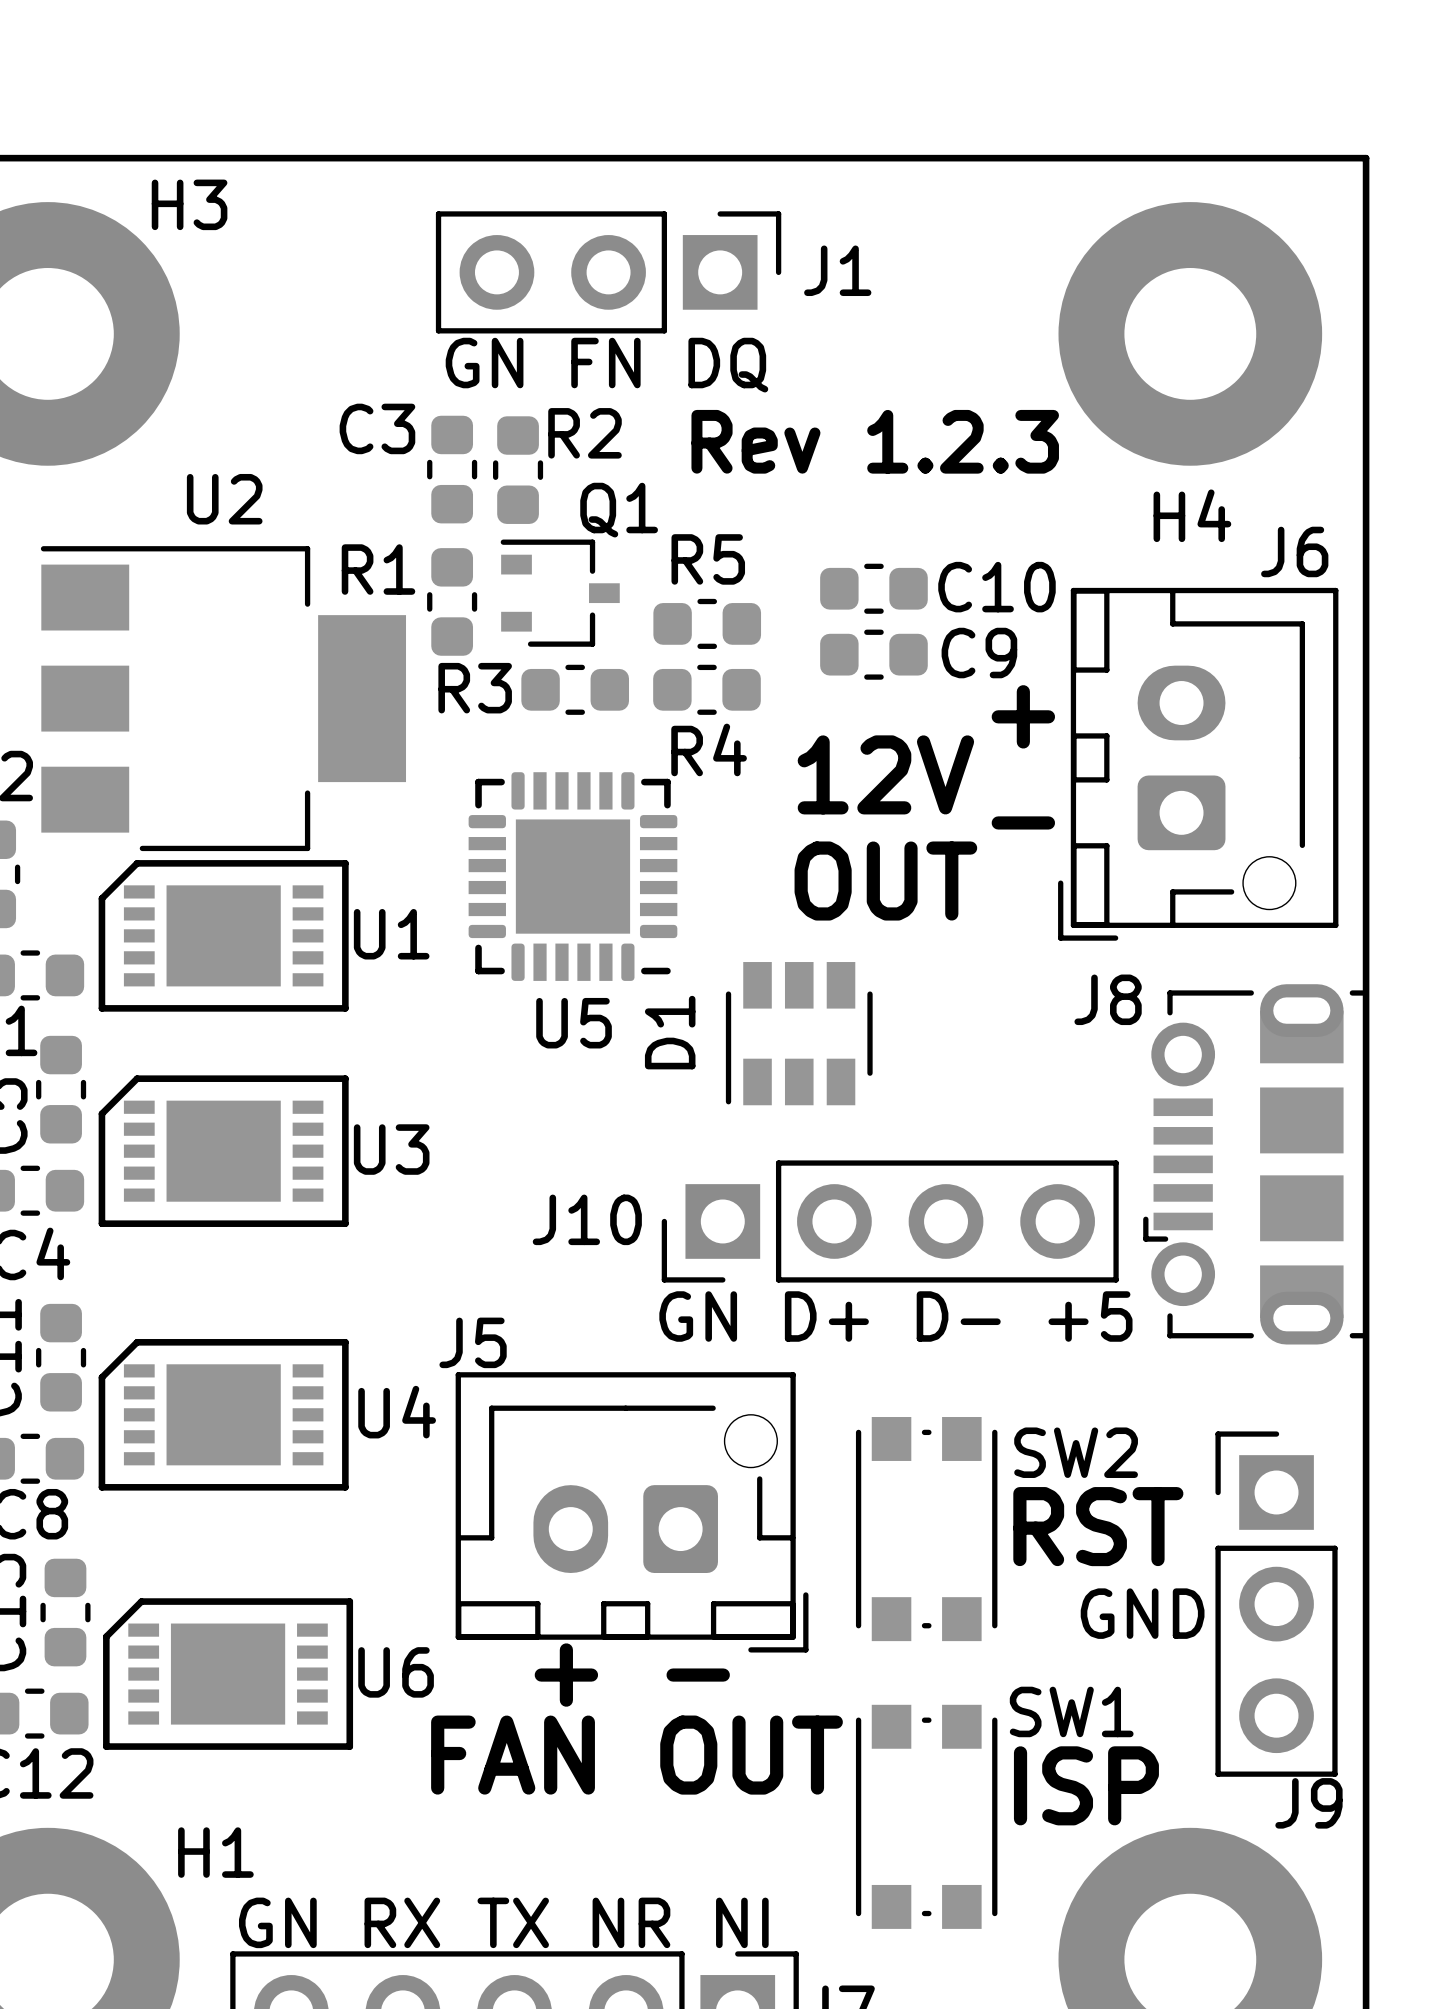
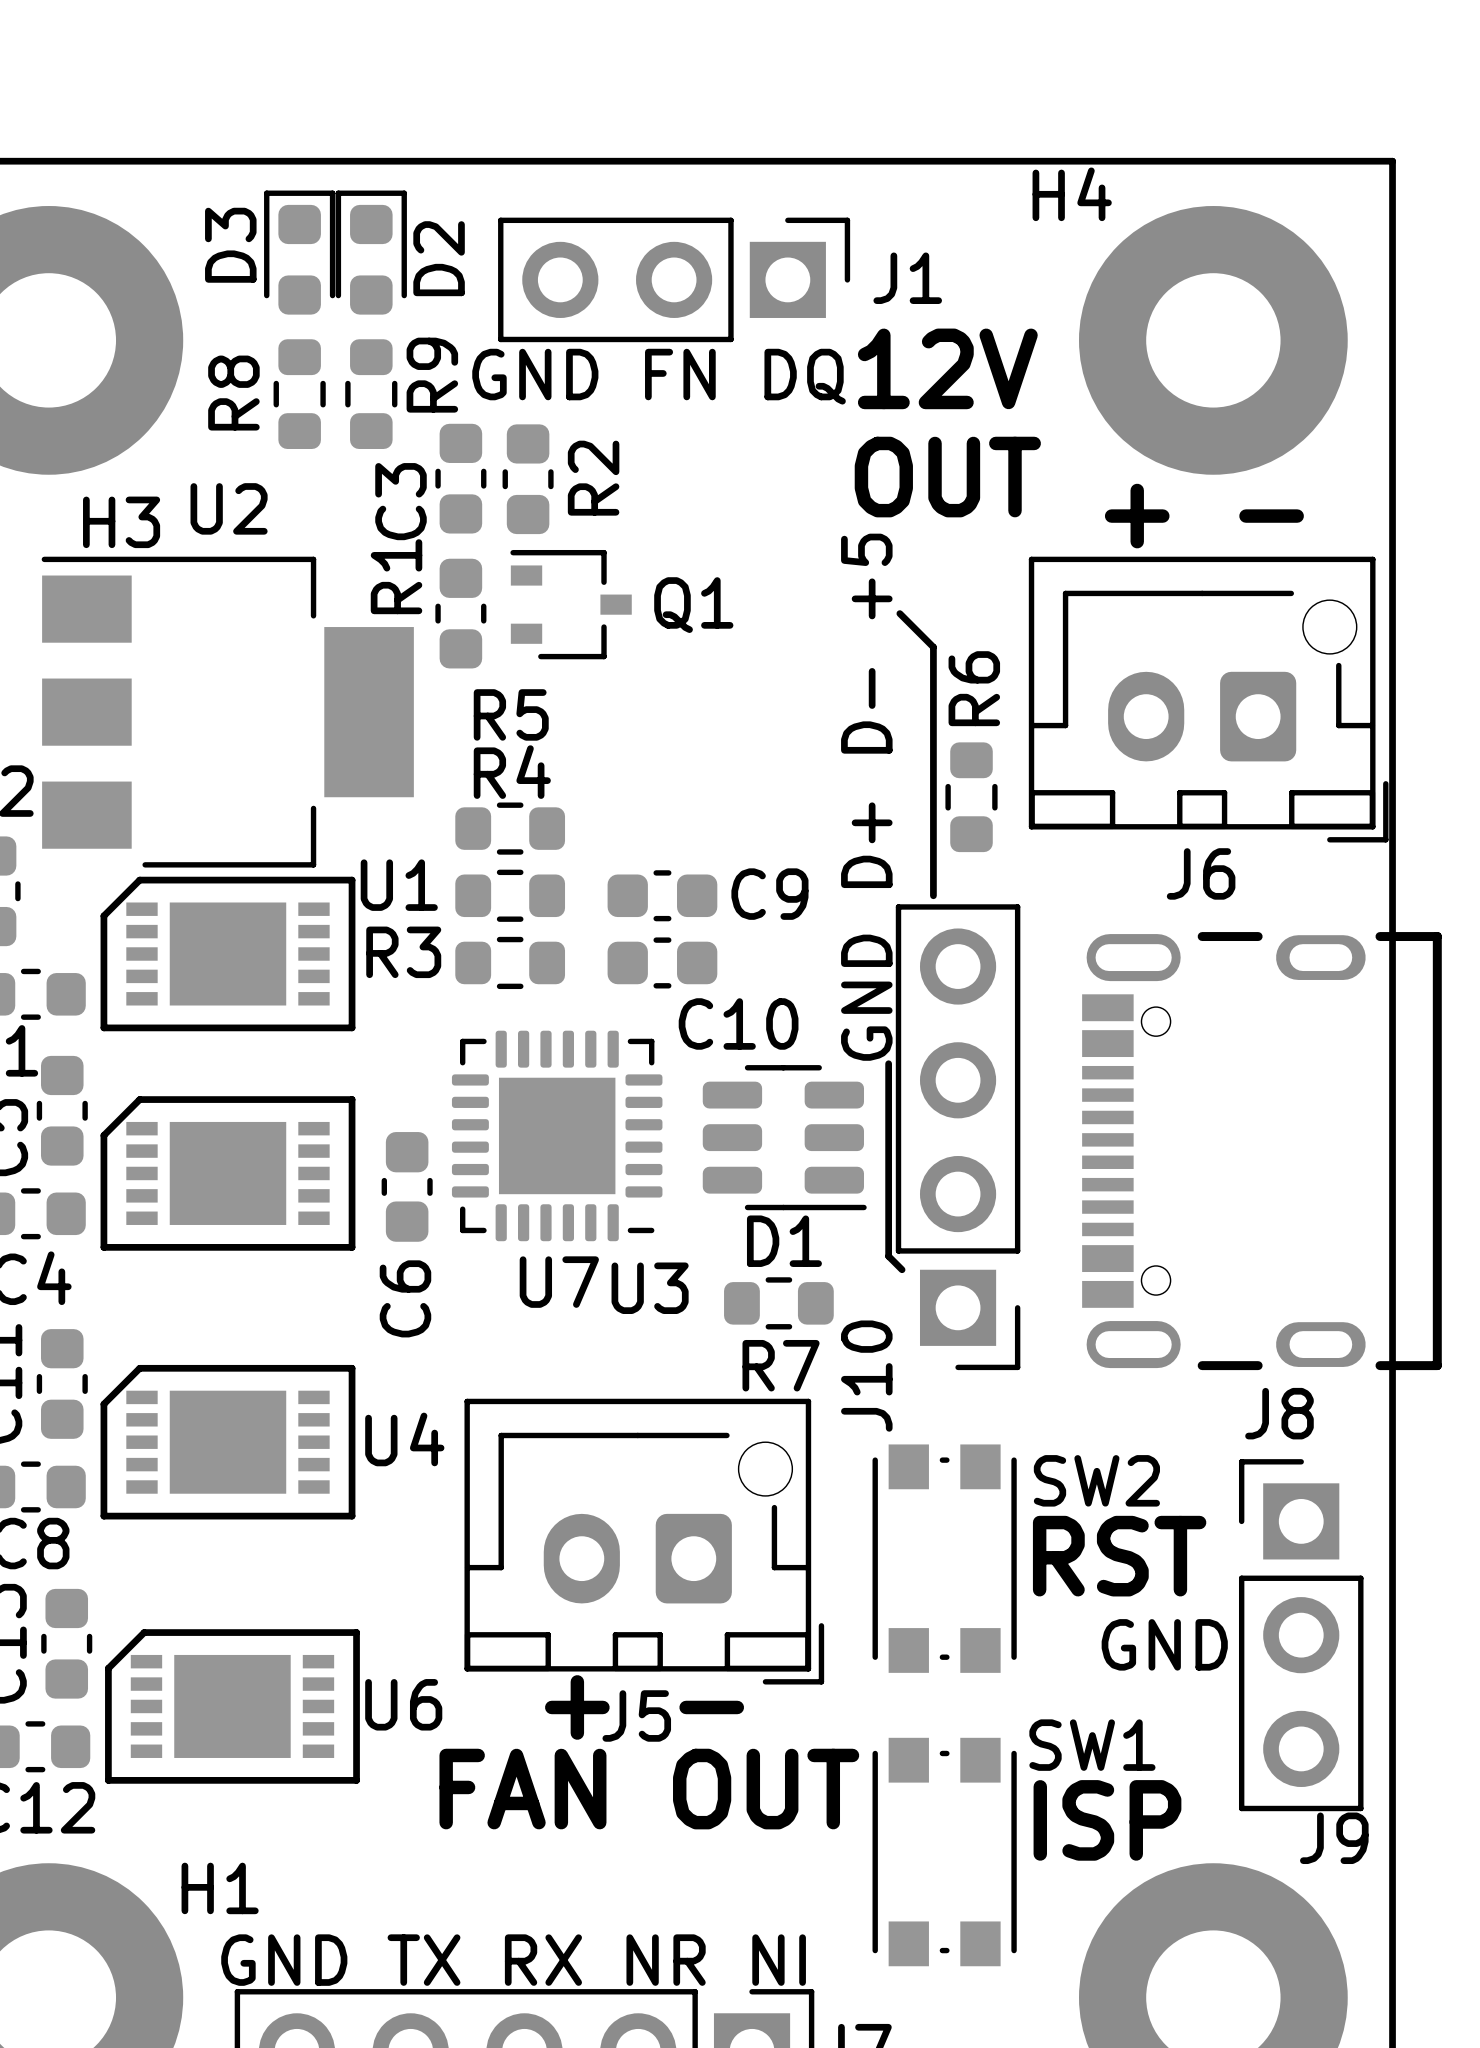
H3 name position: H3 (189, 204) -> H3 (121, 522)
D3: none -> (299, 252)
D2: none -> (371, 252)
J1 position: (608, 272) -> (674, 279)
text: GN FN DQ (606, 365) -> GND FN DQ (659, 376)
R8: none -> (299, 394)
R9: none -> (371, 394)
C3 name rotation: 0° (377, 428) -> 90° counterclockwise (400, 501)
R2 name rotation: 0° (585, 433) -> 90° counterclockwise (593, 478)
text: Rev 1.2.3 (875, 441) -> none
text: none -> + - (1204, 516)
Q1 name position: Q1 (619, 510) -> Q1 (693, 605)
H4 name position: H4 (1192, 515) -> H4 (1072, 194)
J6 name position: J6 (1294, 551) -> J6 (1201, 873)
C10 footprint: [820, 563, 928, 614] -> [607, 937, 718, 989]
R1 name rotation: 0° (378, 569) -> 90° counterclockwise (396, 576)
R5 footprint: [653, 598, 762, 649] -> [455, 802, 566, 855]
line: none -> (899, 613) (933, 647) (933, 895)
C9 footprint: [820, 629, 928, 680] -> [607, 870, 718, 922]
R3 footprint: [521, 664, 629, 715] -> [455, 936, 566, 990]
R4 footprint: [653, 664, 761, 715] -> [455, 869, 566, 922]
text: + (1023, 716) -> none
R4 name position: R4 (709, 749) -> R4 (512, 772)
J6 rotation: 0° (1198, 764) -> 90° counterclockwise (1208, 699)
text position: 12V (885, 774) -> 12V (947, 368)
text: none -> GND D+ D- +5 (866, 797)
R6: none -> (971, 797)
text: - (1023, 822) -> none
U5: (572, 876) -> none
text position: OUT (885, 881) -> OUT (947, 477)
U1 name position: U1 (391, 934) -> U1 (399, 885)
D1 footprint: [725, 962, 873, 1106] -> [702, 1065, 867, 1211]
J8 footprint: [1143, 984, 1366, 1345] -> [1082, 932, 1442, 1371]
J8 name position: J8 (1108, 999) -> J8 (1279, 1413)
D1 name position: D1 (670, 1032) -> D1 (784, 1241)
line: none -> (888, 1063) (888, 1256) (902, 1269)
U7: none -> (557, 1135)
U3 name position: U3 (391, 1149) -> U3 (650, 1288)
C6: none -> (407, 1186)
J10 name position: J10 (587, 1219) -> J10 (866, 1376)
J10 rotation: 0° (890, 1221) -> 90° counterclockwise (958, 1137)
R7: none -> (778, 1303)
text: GN D+ D- +5 (895, 1316) -> none
J5 name position: J5 (473, 1342) -> J5 (636, 1715)
text: GN RX TX NR NI (503, 1922) -> GND TX RX NR NI (513, 1960)

